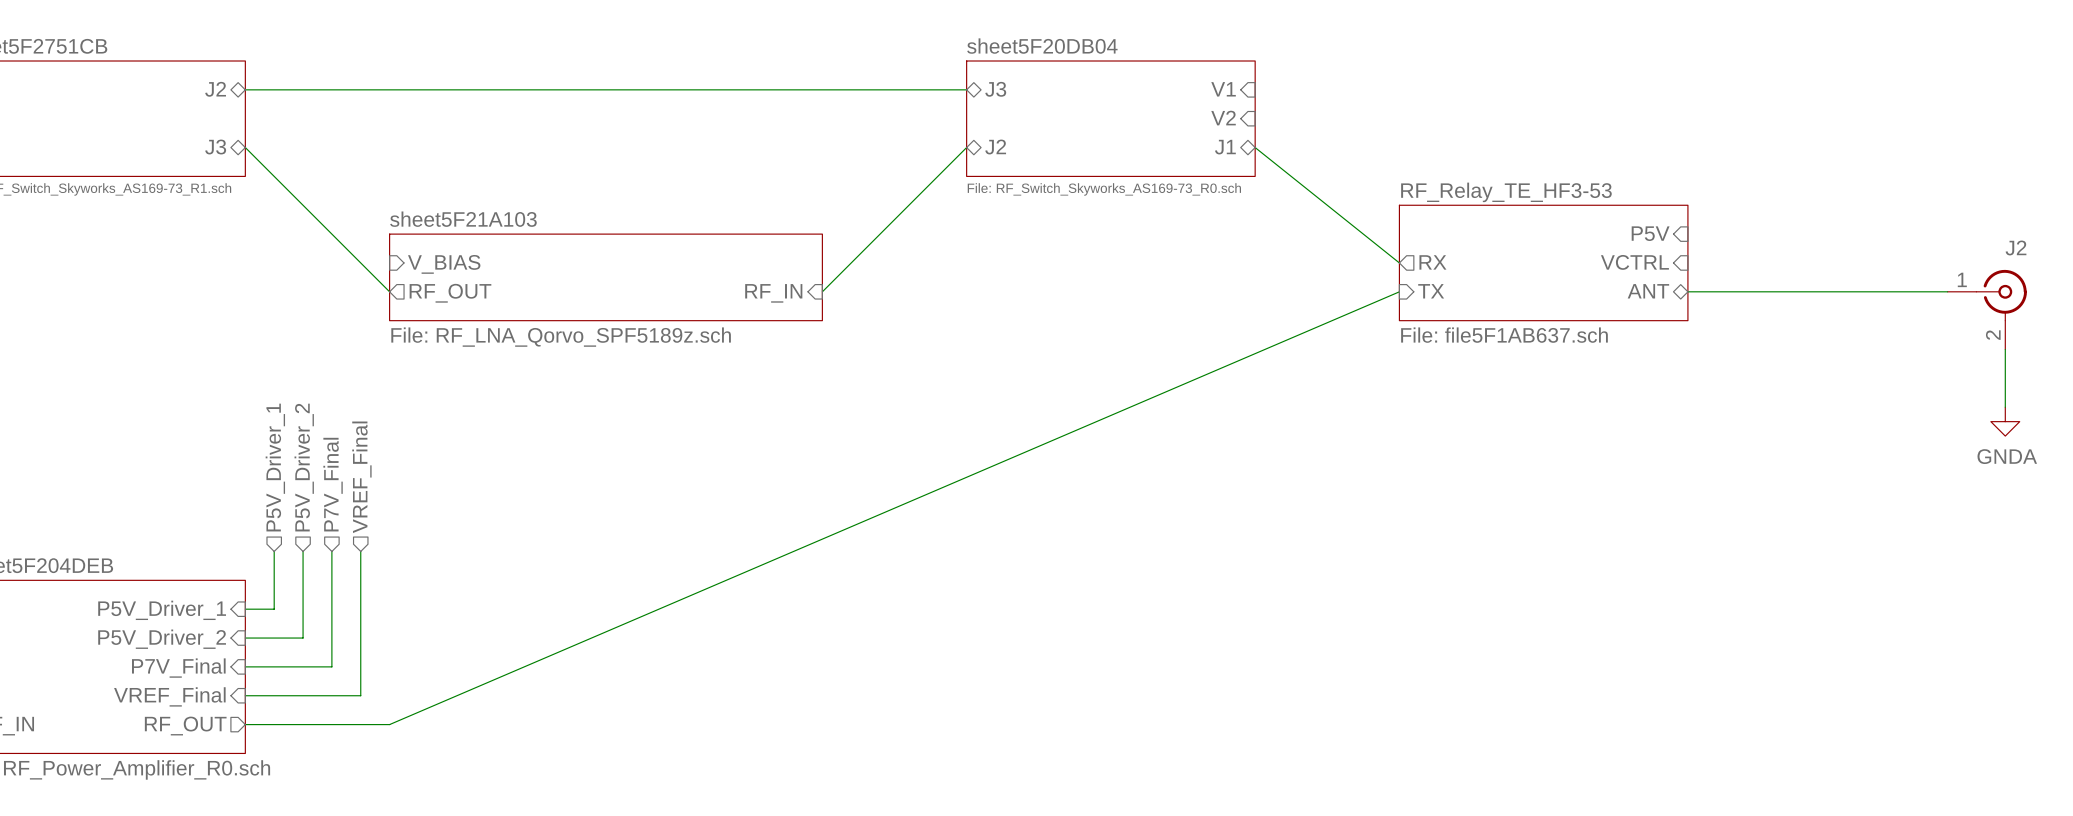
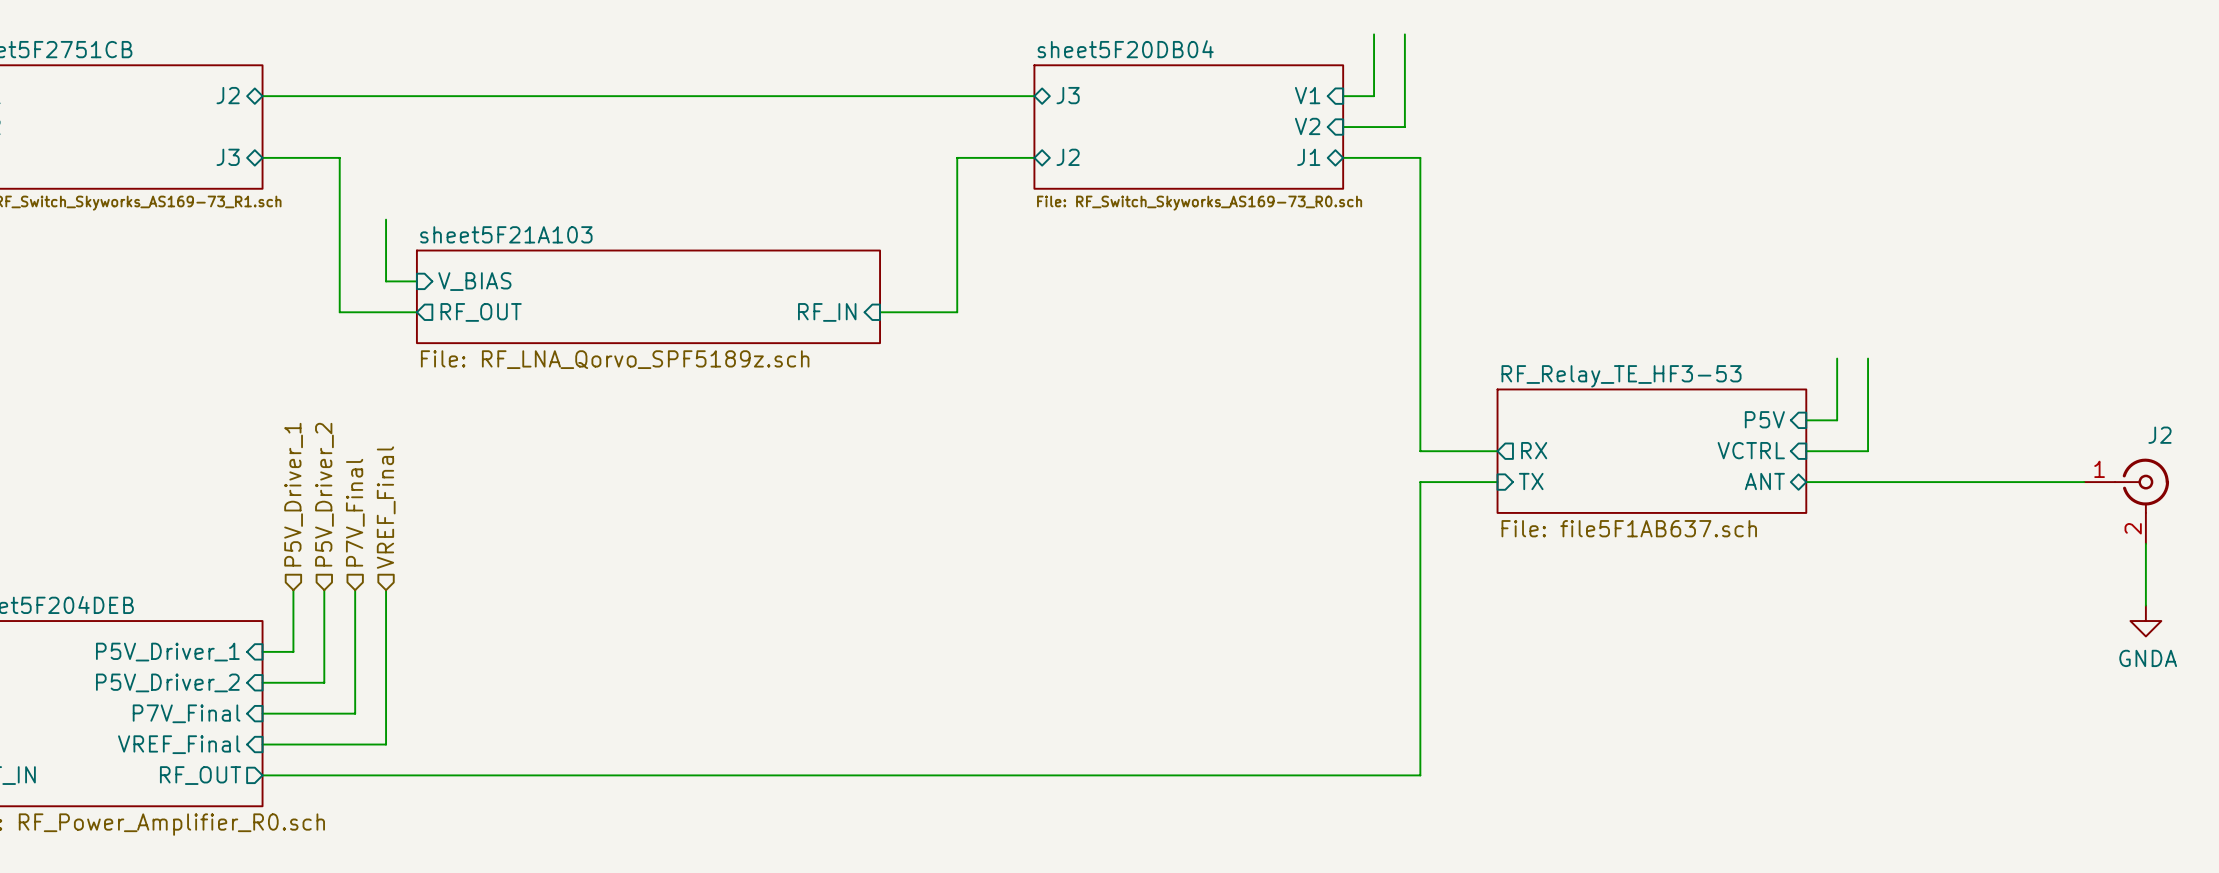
wire: none -> (1374, 34) (1374, 96) (1343, 96)
wire: none -> (1404, 34) (1404, 127) (1343, 127)
wire: (245, 147) (389, 291) -> (262, 157) (339, 157) (339, 312) (416, 312)
wire: (966, 147) (822, 291) -> (1034, 157) (957, 157) (957, 312) (880, 312)
wire: (1255, 147) (1399, 262) -> (1343, 157) (1420, 157) (1420, 451) (1497, 451)
wire: none -> (386, 219) (386, 281) (416, 281)
sheet pin position: P5V (1650, 233) -> P5V (1764, 419)
sheet pin position: RX (1432, 262) -> RX (1534, 450)
sheet RF_Relay_TE_HF3-53 position: (1543, 262) -> (1651, 451)
sheet pin position: VCTRL (1634, 262) -> VCTRL (1751, 450)
wire: (1399, 291) (389, 724) -> (1497, 482) (1420, 482) (1420, 775) (416, 775)
sheet pin position: TX (1431, 291) -> TX (1531, 481)
sheet pin position: ANT (1648, 291) -> ANT (1764, 481)
wire: (1687, 291) (1947, 291) -> (1806, 482) (2084, 482)
J2 position: (1987, 309) -> (2126, 501)
wire: none -> (1837, 358) (1837, 420) (1806, 420)
wire: none -> (1868, 358) (1868, 451) (1806, 451)
wire: (2005, 349) (2005, 407) -> (2145, 543) (2145, 605)
power symbol position: GNDA (2005, 421) -> GNDA (2145, 621)

